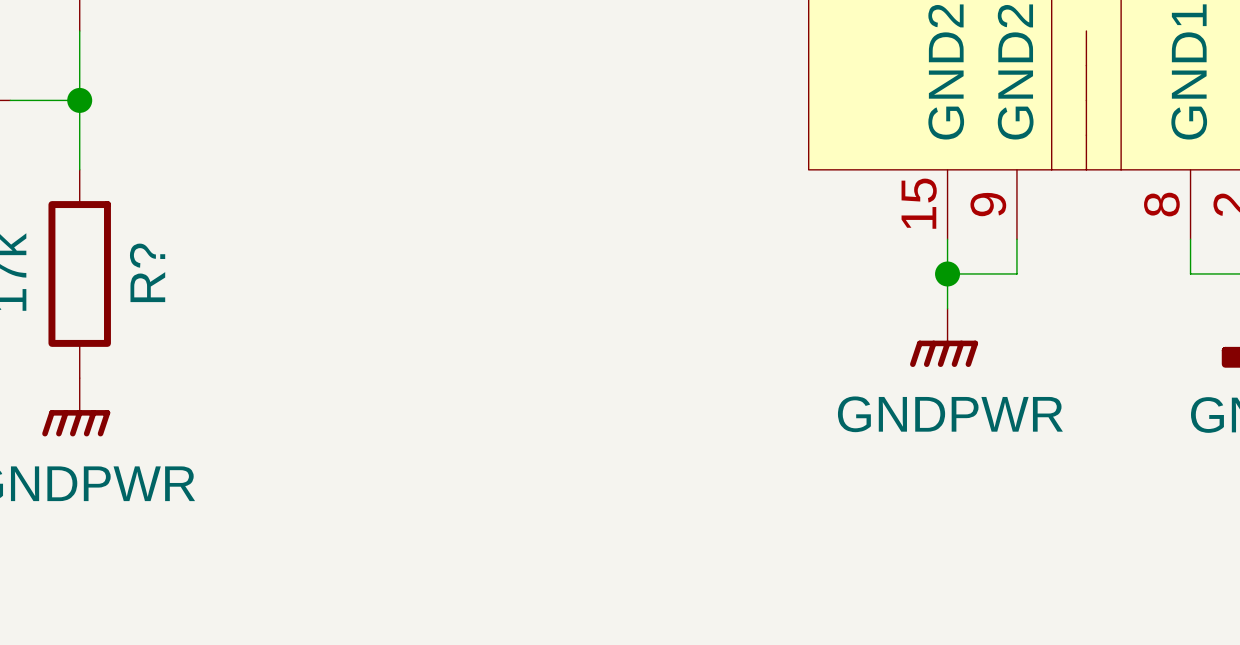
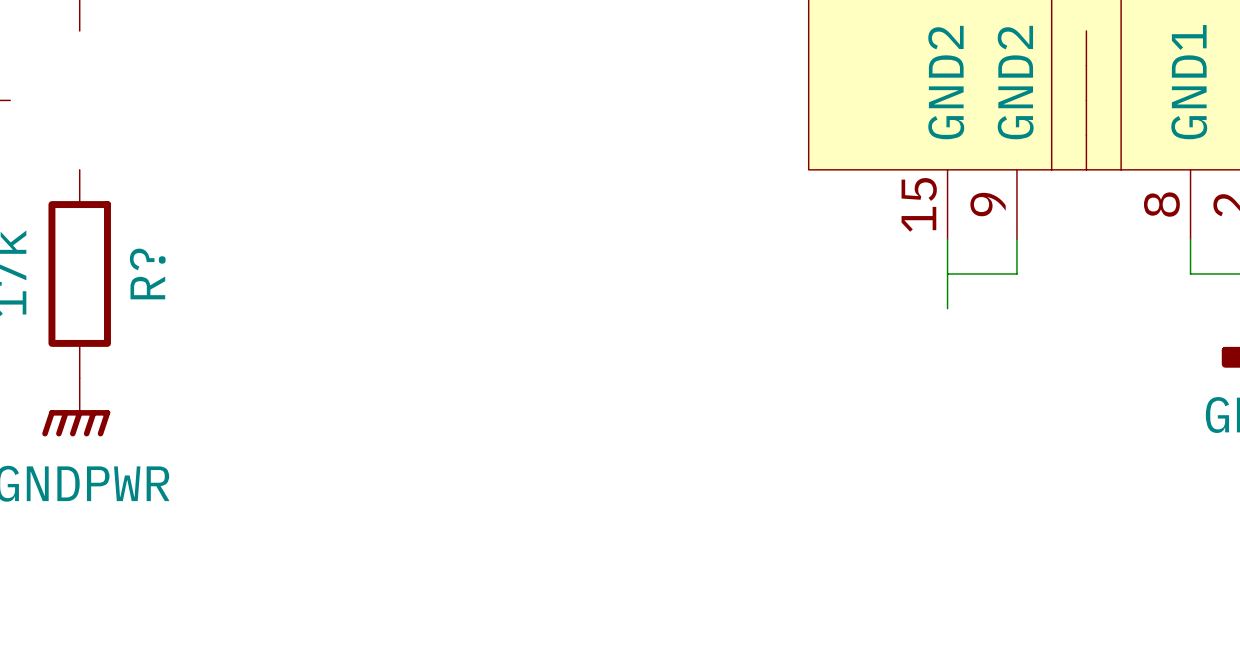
wire: (79, 30) (79, 169) -> none
wire: (10, 100) (79, 100) -> none
junction: (79, 100) -> none
junction: (947, 273) -> none
power symbol: GNDPWR (944, 337) -> none

